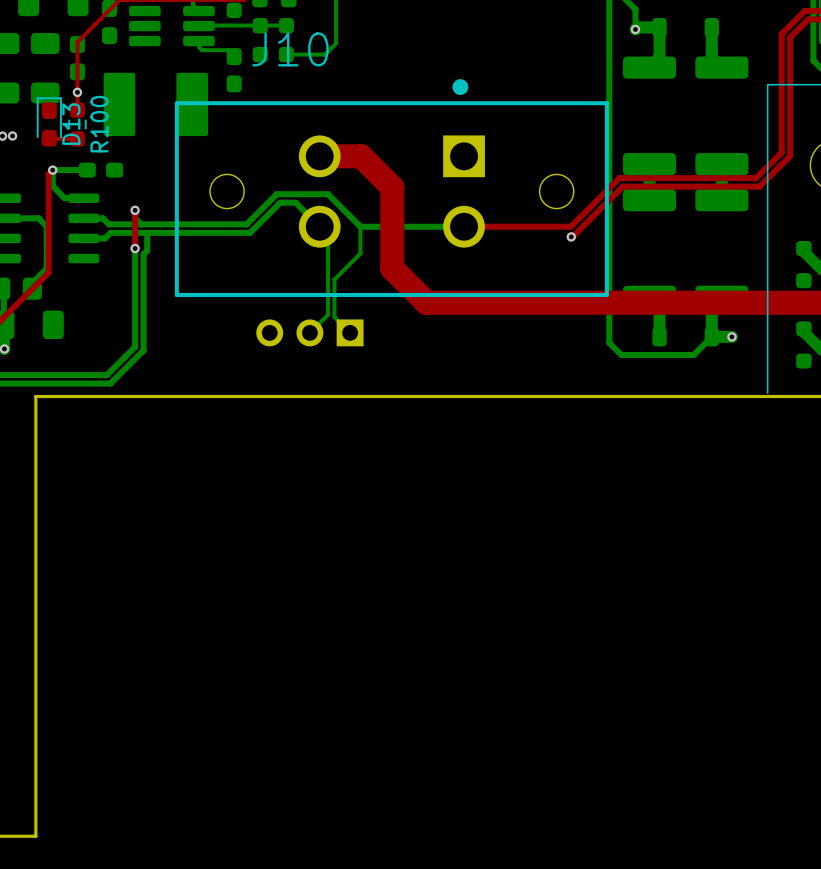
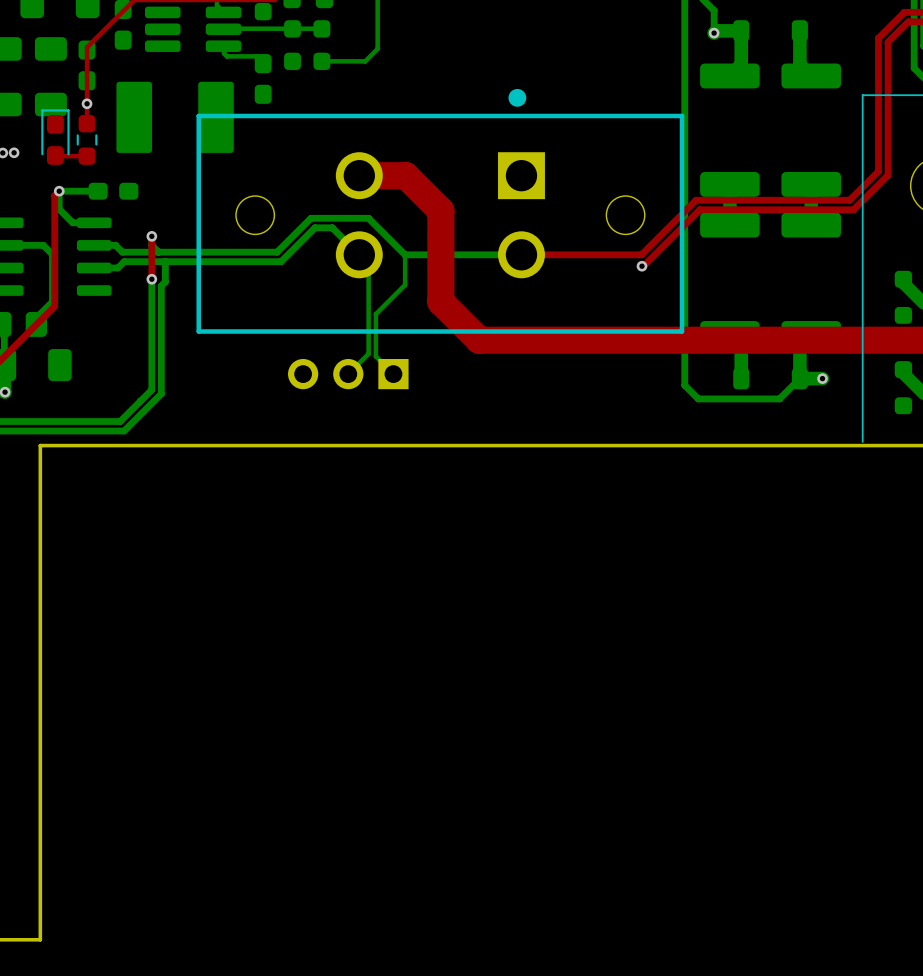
J10 name: J10 (290, 49) -> none
D13 name: D13 (71, 124) -> none
R100 name: R100 (99, 124) -> none

